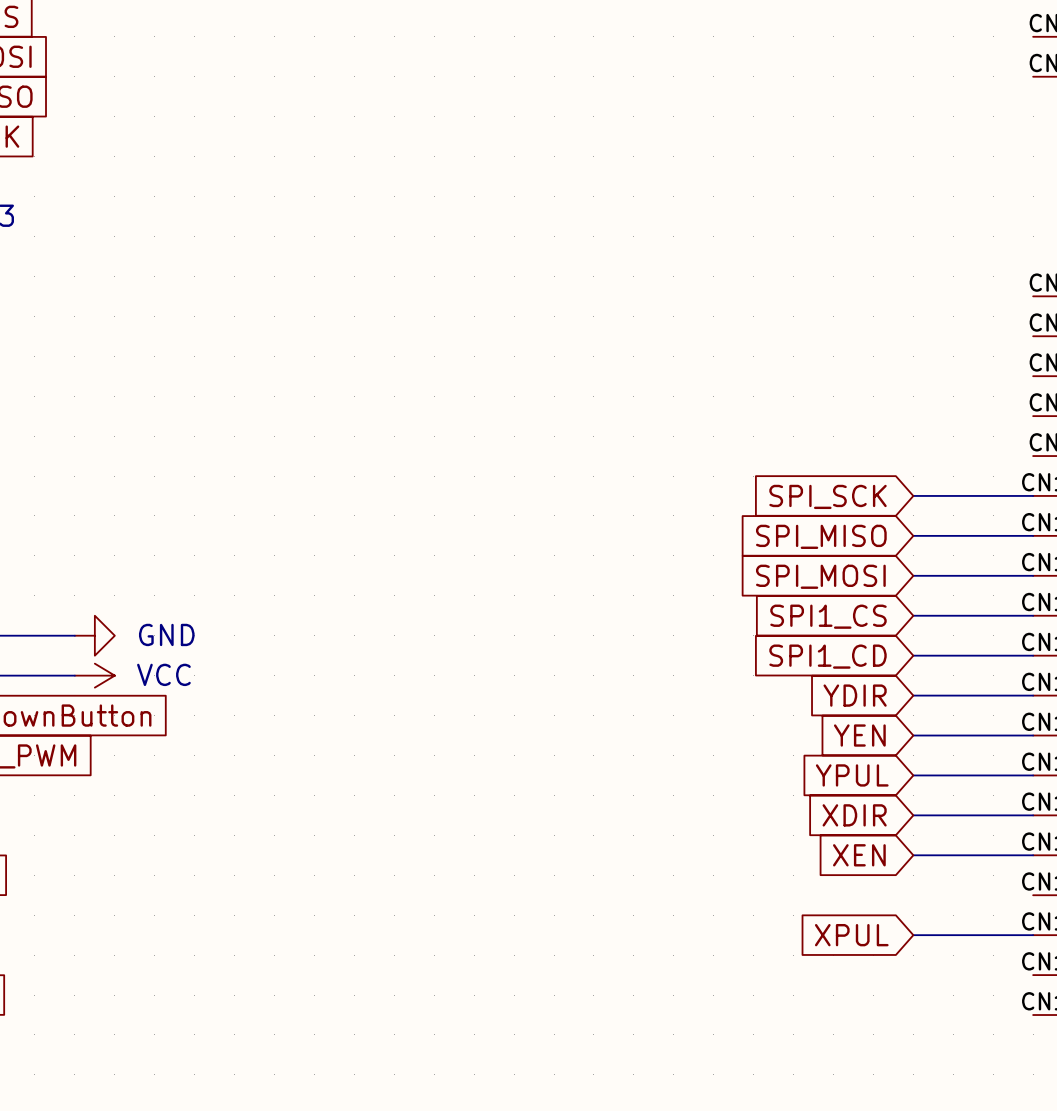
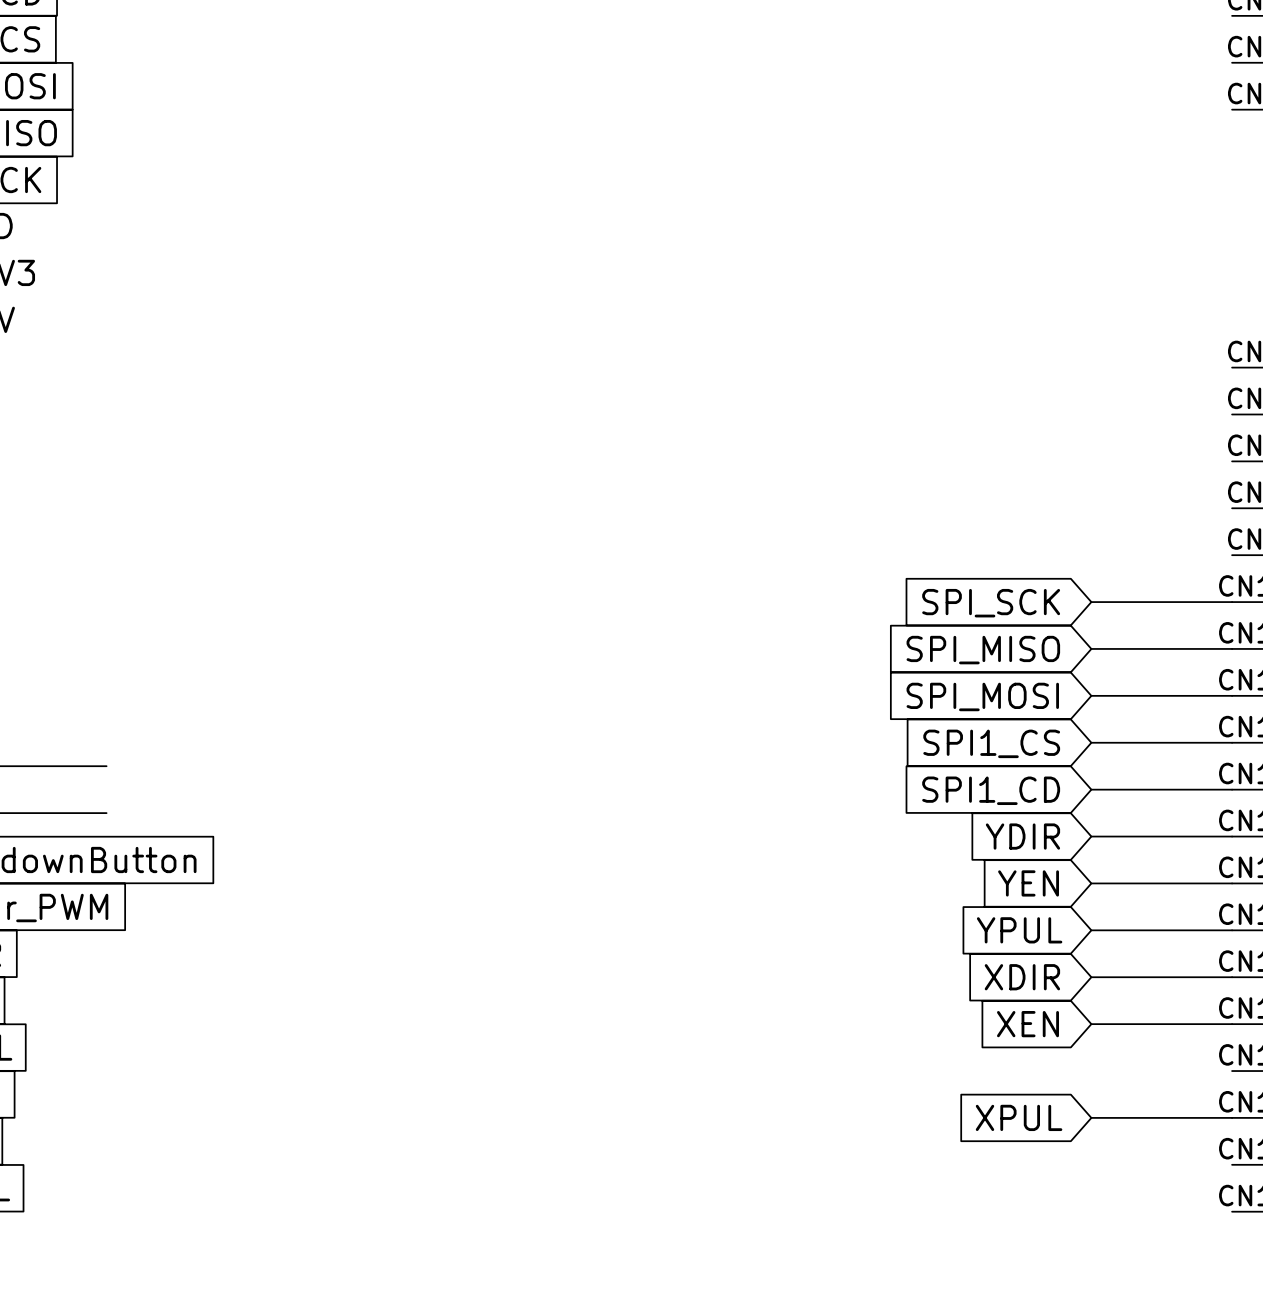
power symbol: GND (94, 635) -> none
power symbol: VCC (94, 675) -> none

